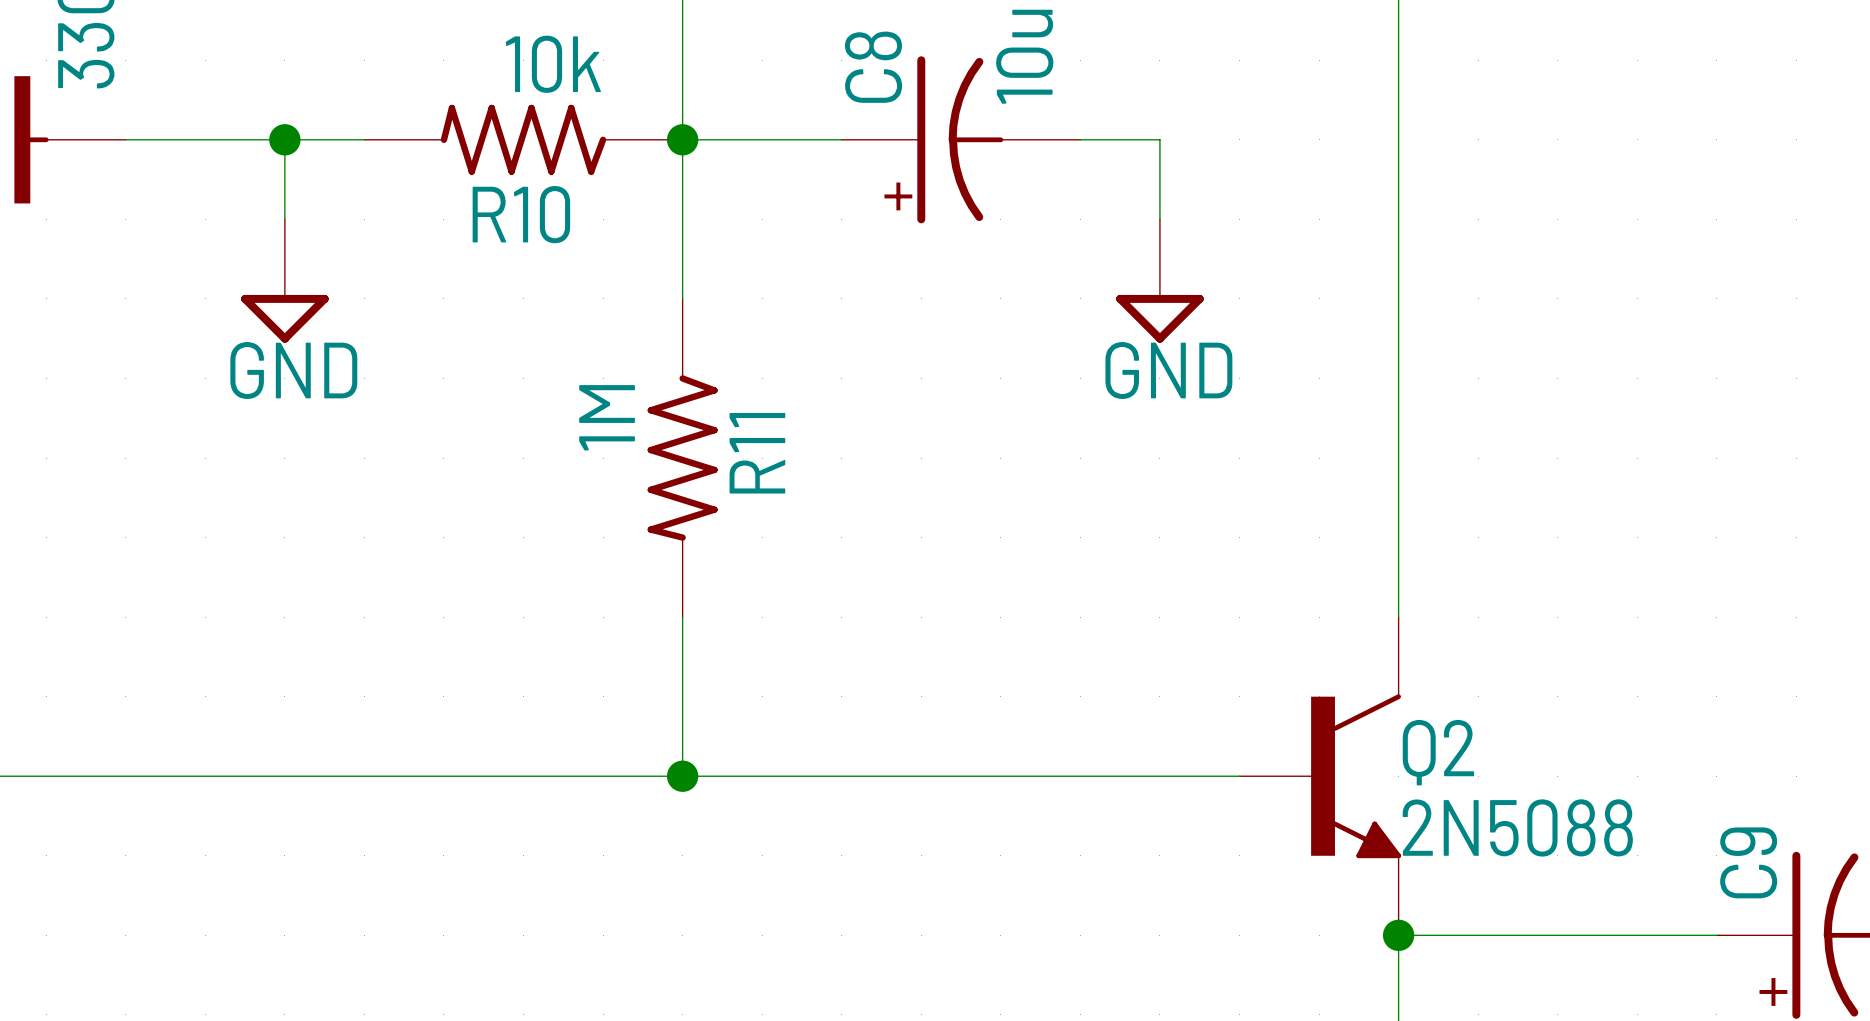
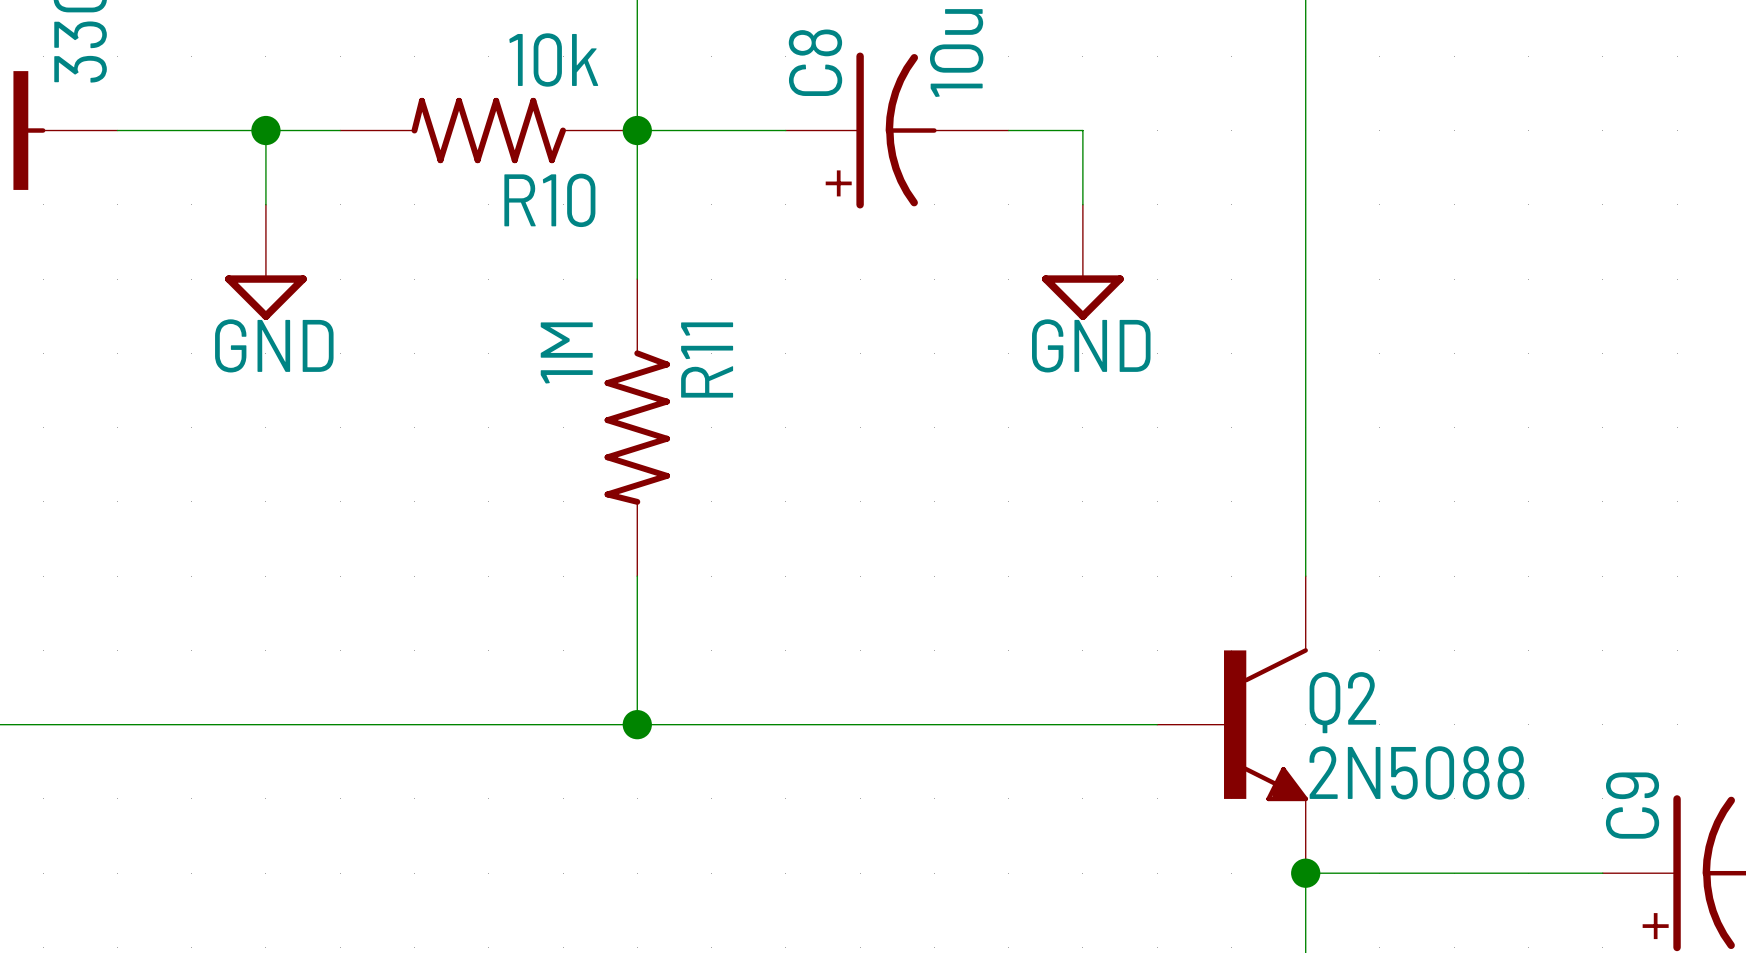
R10 value position: 10k (553, 64) -> 10k (553, 60)
R10 name position: R10 (521, 214) -> R10 (549, 200)
R11 value position: 1M (607, 417) -> 1M (566, 352)
R11 name position: R11 (757, 453) -> R11 (707, 360)

